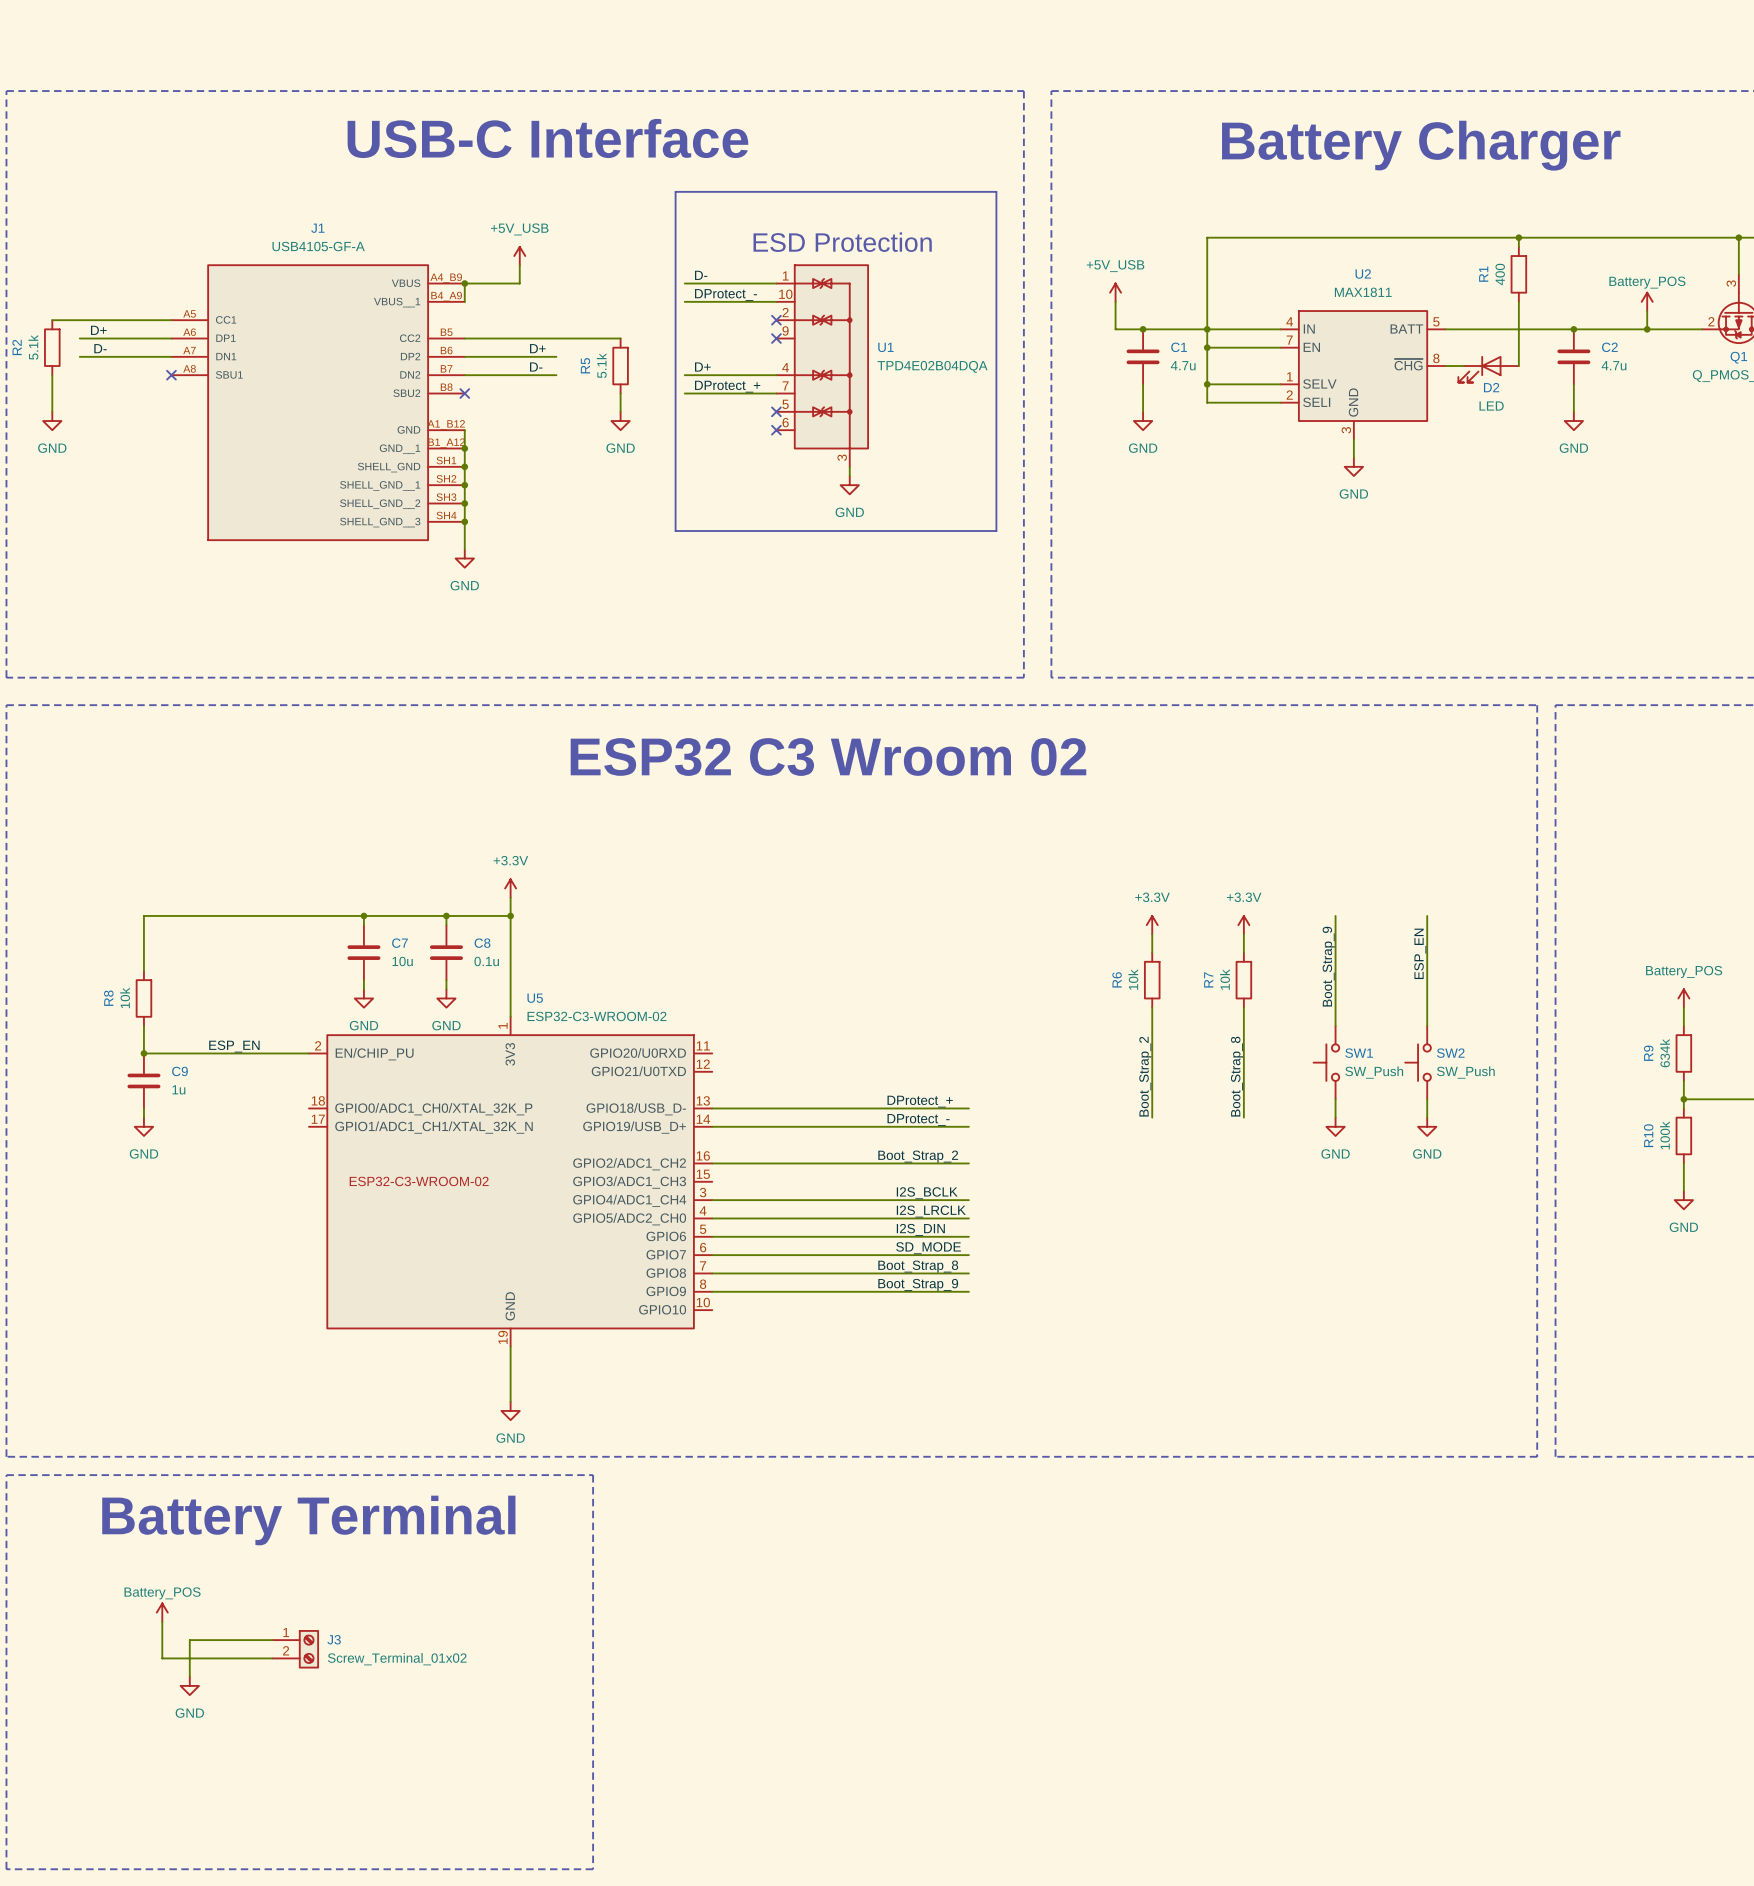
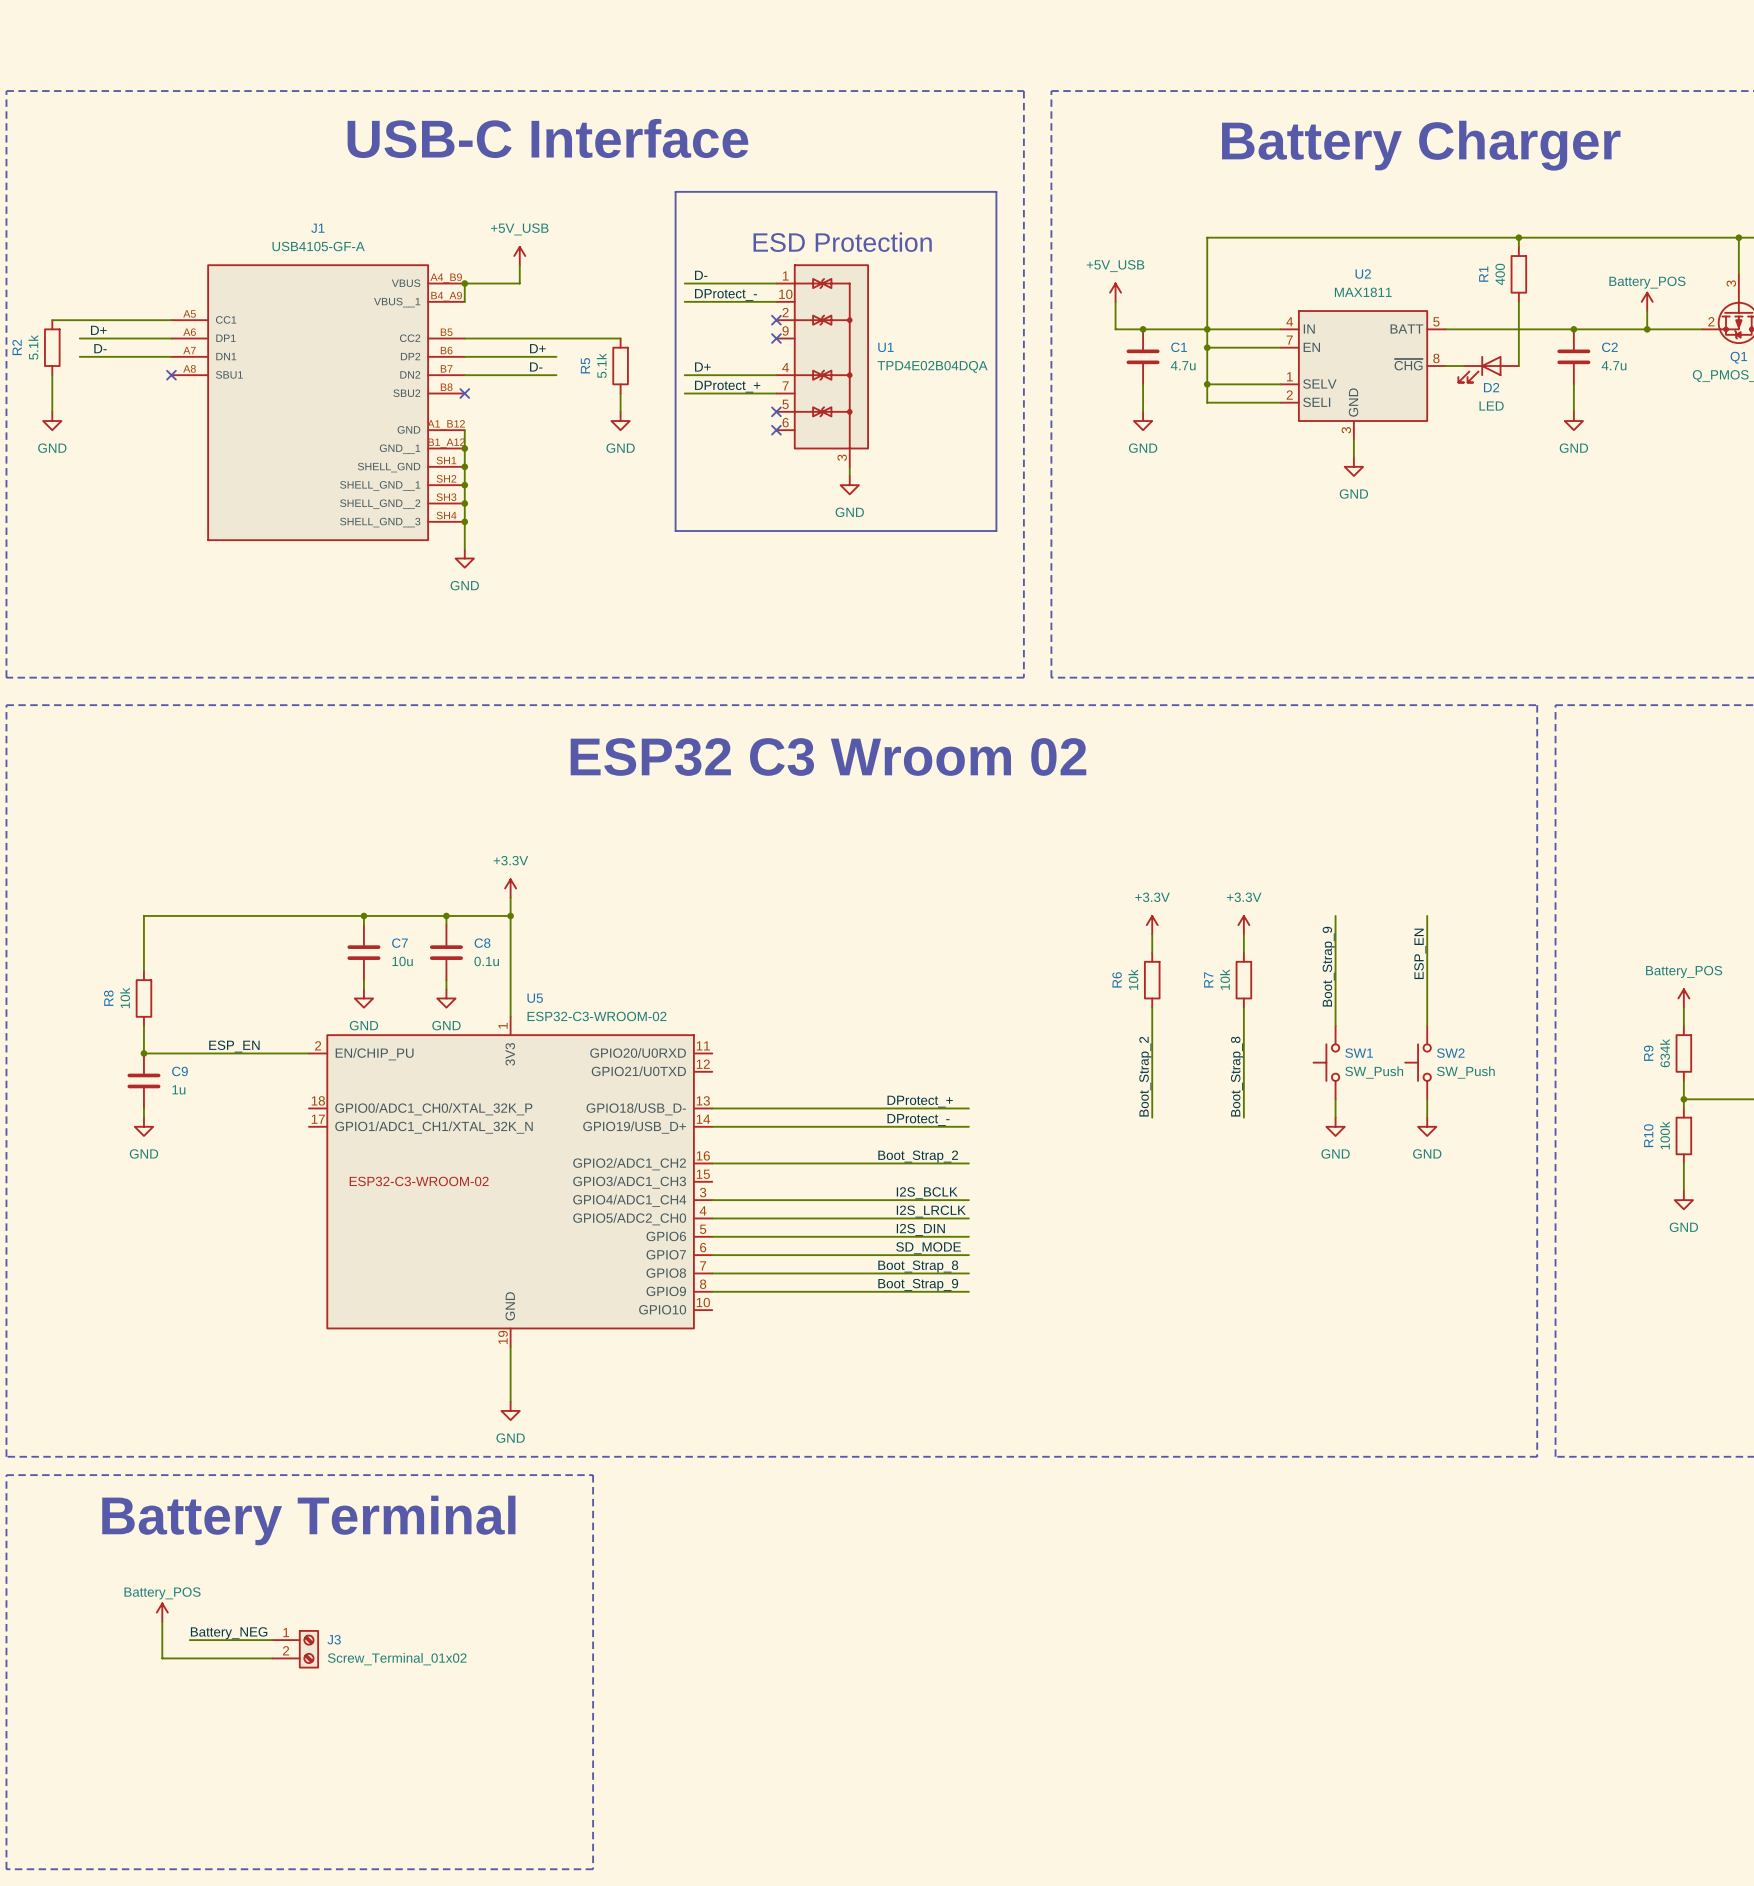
label: none -> Battery_NEG (229, 1633)
wire: (189, 1640) (189, 1676) -> none
power symbol: GND (189, 1685) -> none

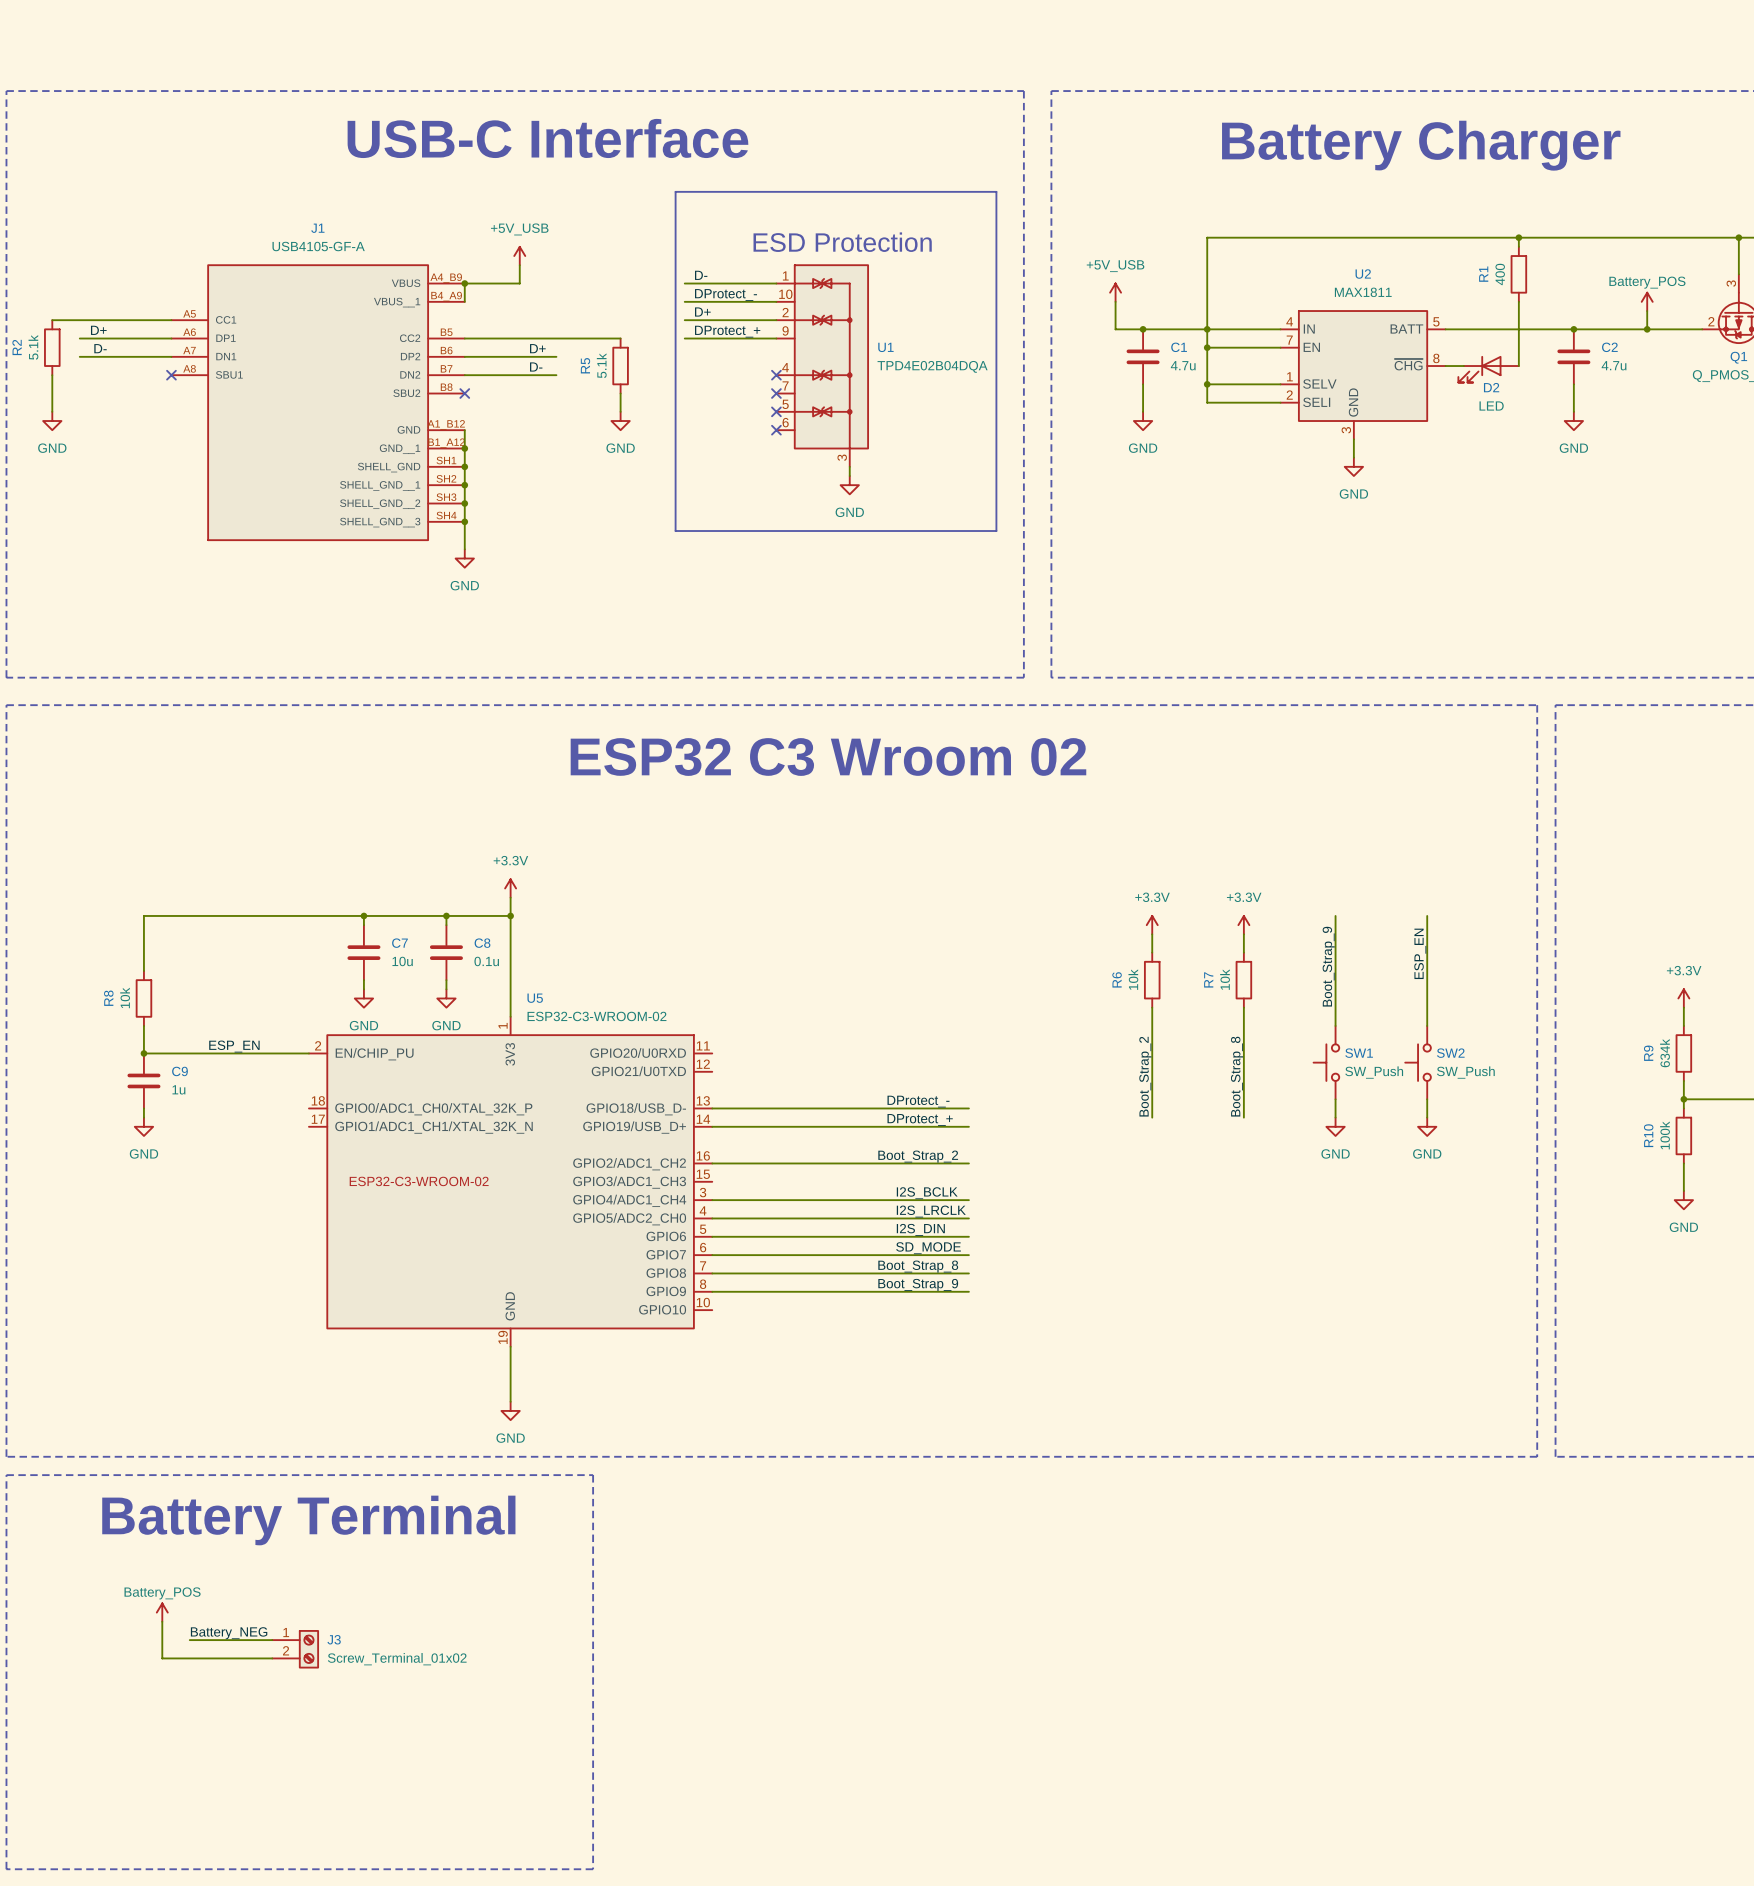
no-connect mark: (776, 320) -> none
no-connect mark: (776, 338) -> none
label position: D+ (702, 367) -> D+ (702, 312)
wire: (684, 375) (776, 375) -> (684, 338) (776, 338)
no-connect mark: none -> (776, 375)
label position: DProtect_+ (727, 386) -> DProtect_+ (727, 331)
wire: (684, 393) (776, 393) -> (684, 320) (776, 320)
no-connect mark: none -> (776, 393)
power symbol: Battery_POS (1683, 998) -> +3.3V (1683, 998)
label: DProtect_+ (920, 1101) -> DProtect_- (918, 1101)
label: DProtect_- (918, 1119) -> DProtect_+ (920, 1119)

